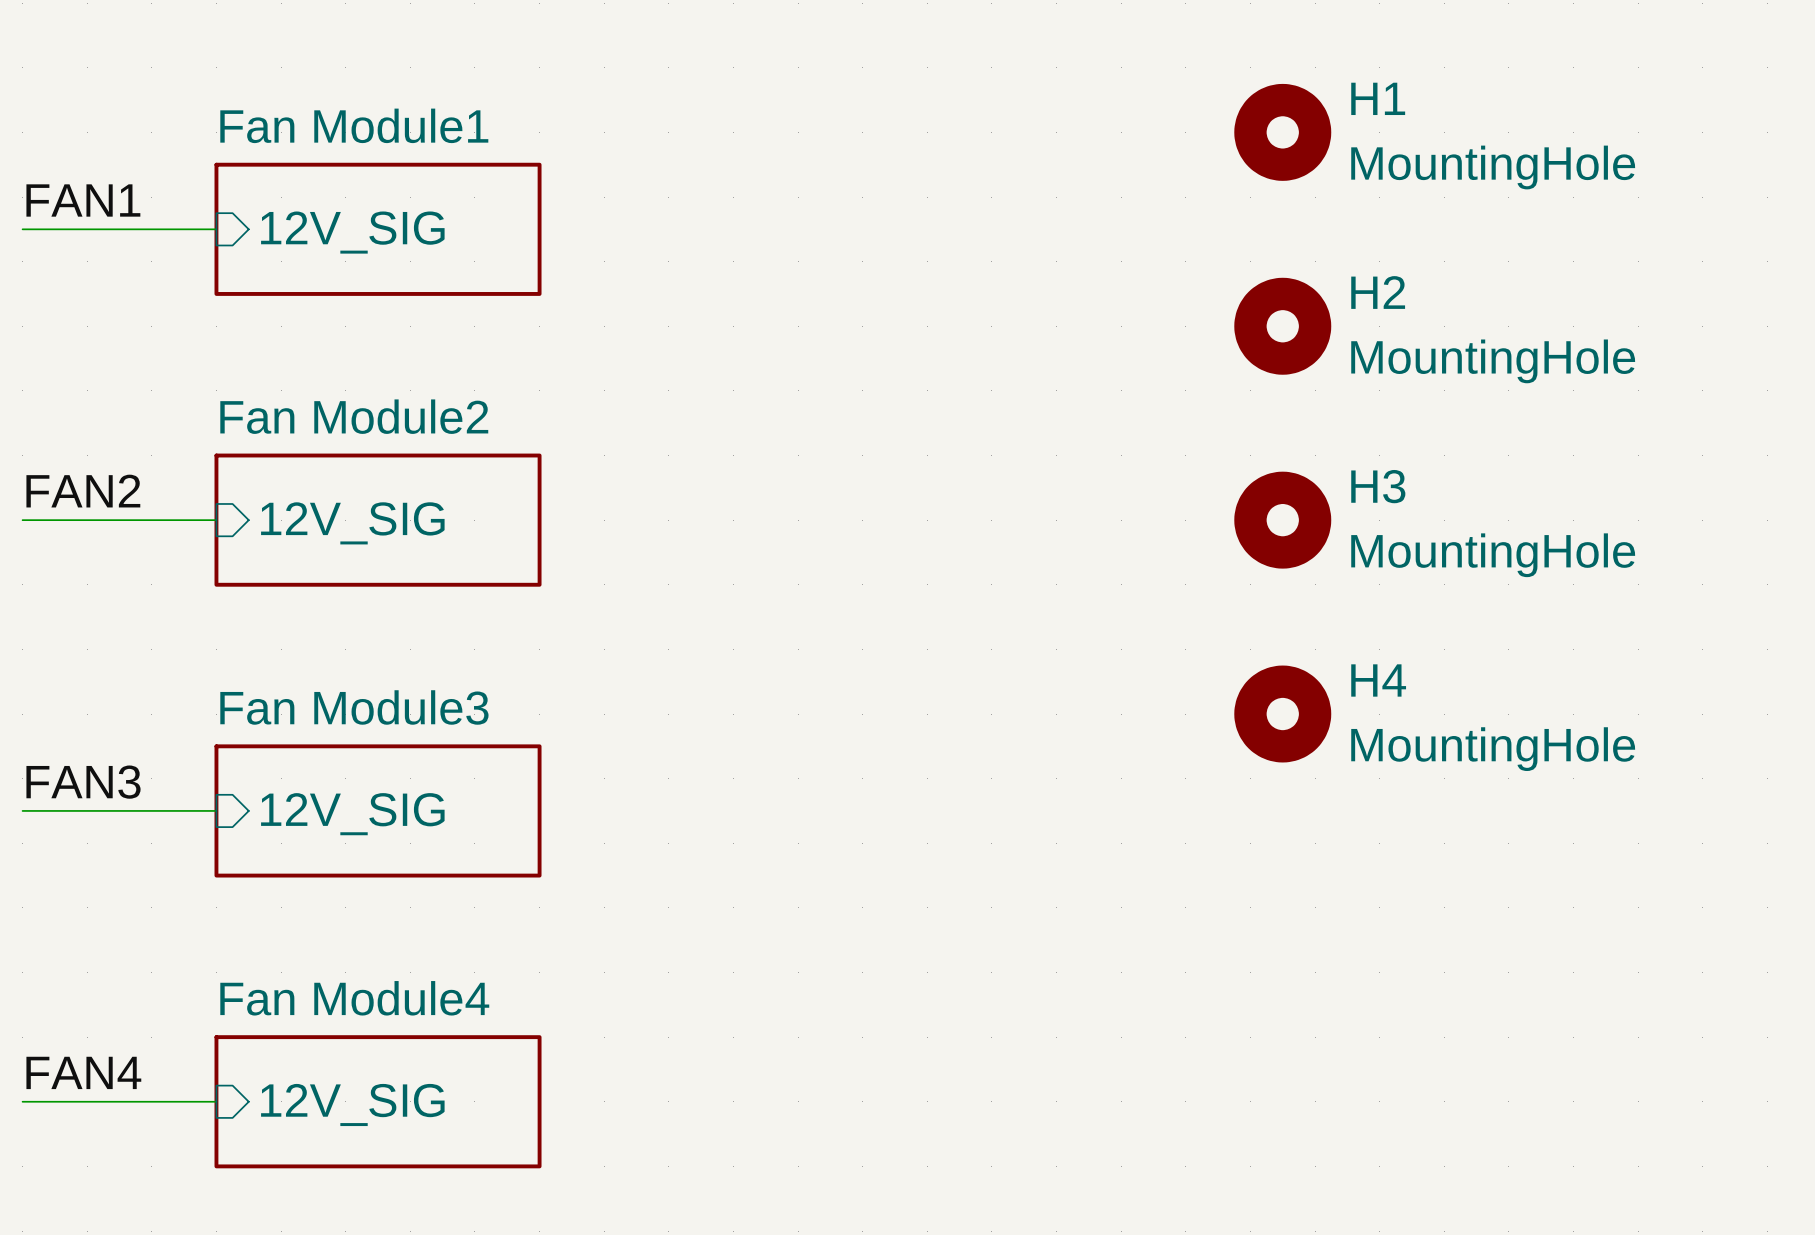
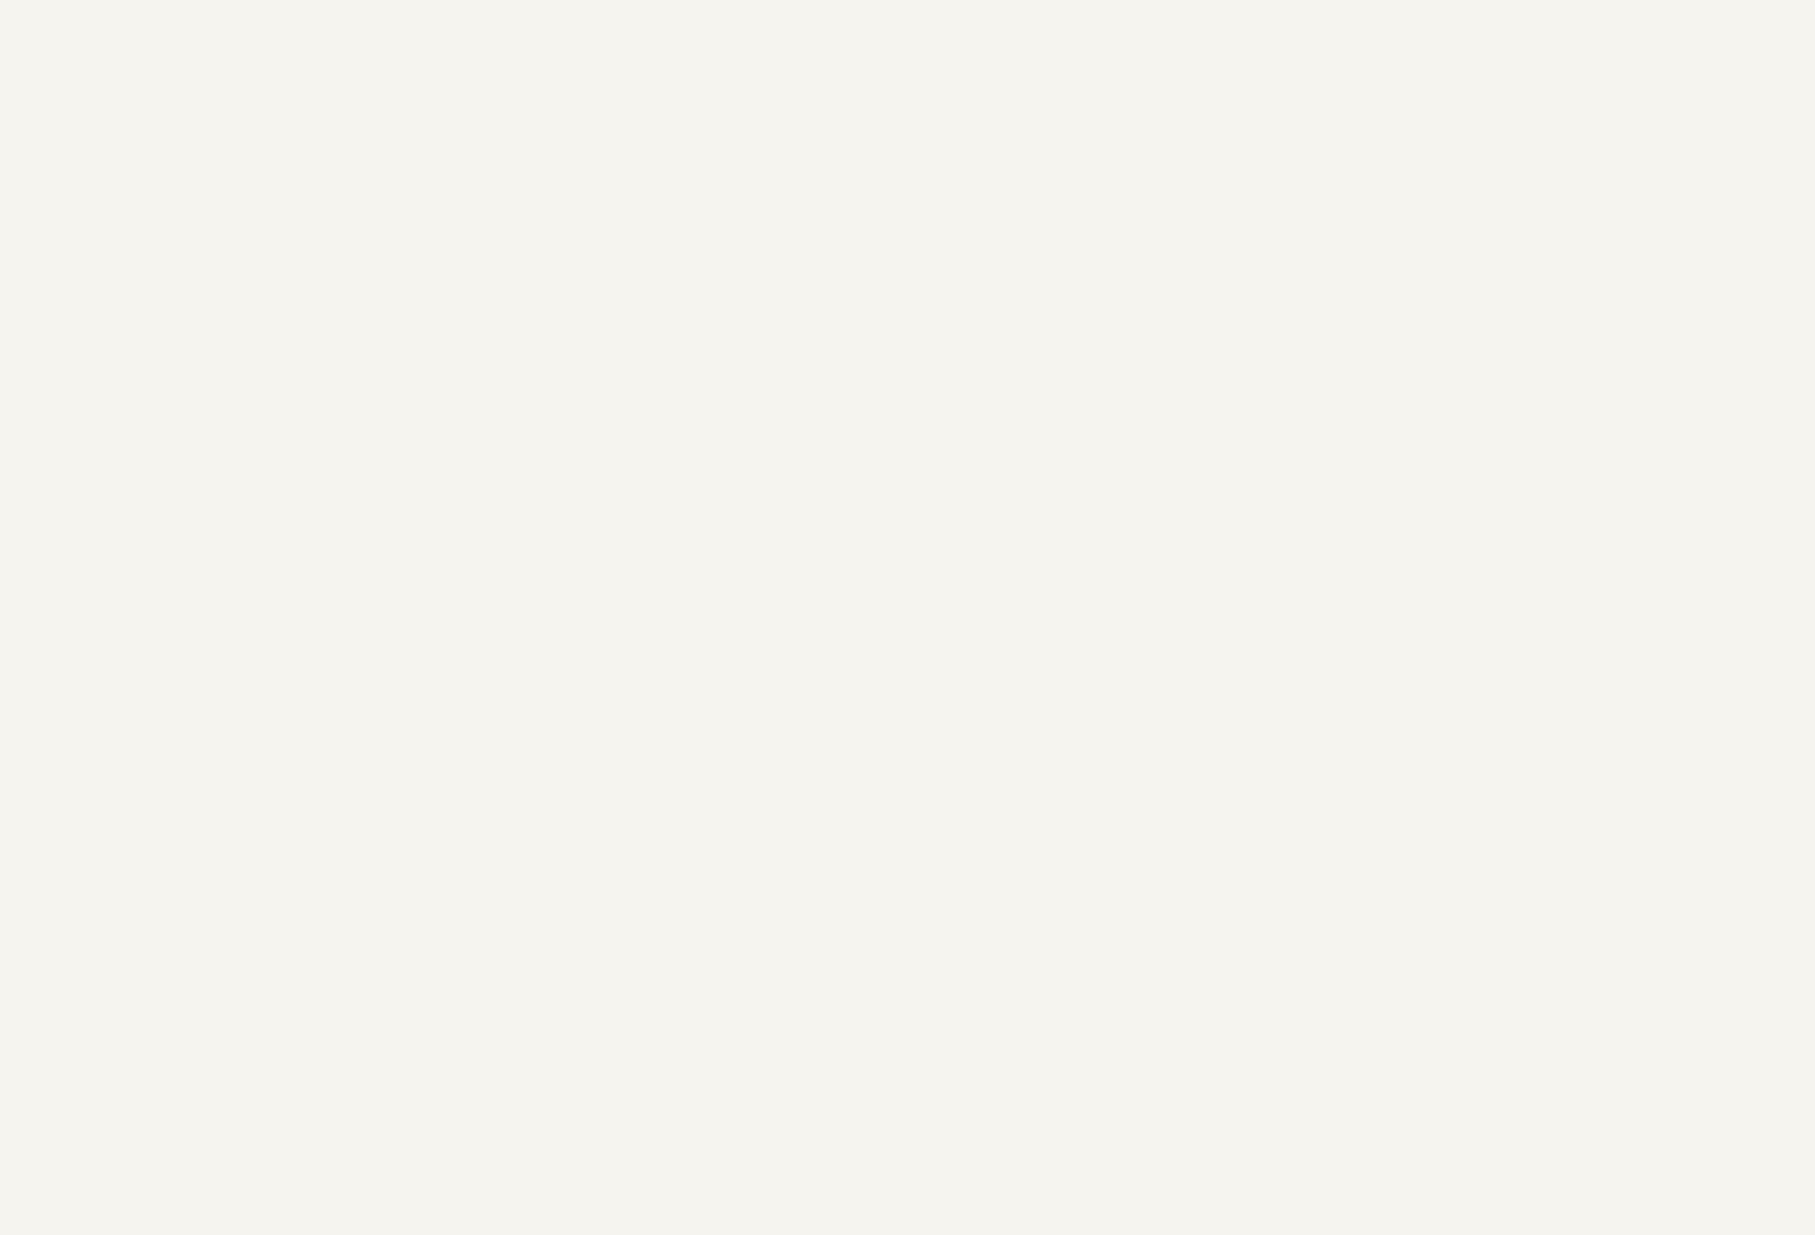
H1: MountingHole (1282, 132) -> none
label: FAN1 (83, 200) -> none
wire: (22, 229) (216, 229) -> none
sheet Fan Module1: (378, 229) -> none
sheet pin: 12V_SIG (352, 232) -> none
H2: MountingHole (1282, 326) -> none
label: FAN2 (83, 491) -> none
wire: (22, 520) (216, 520) -> none
sheet Fan Module2: (378, 520) -> none
H3: MountingHole (1282, 520) -> none
sheet pin: 12V_SIG (352, 523) -> none
H4: MountingHole (1282, 714) -> none
label: FAN3 (83, 782) -> none
wire: (22, 810) (216, 810) -> none
sheet Fan Module3: (378, 810) -> none
sheet pin: 12V_SIG (352, 814) -> none
label: FAN4 (83, 1072) -> none
wire: (22, 1101) (216, 1101) -> none
sheet Fan Module4: (378, 1101) -> none
sheet pin: 12V_SIG (352, 1104) -> none

